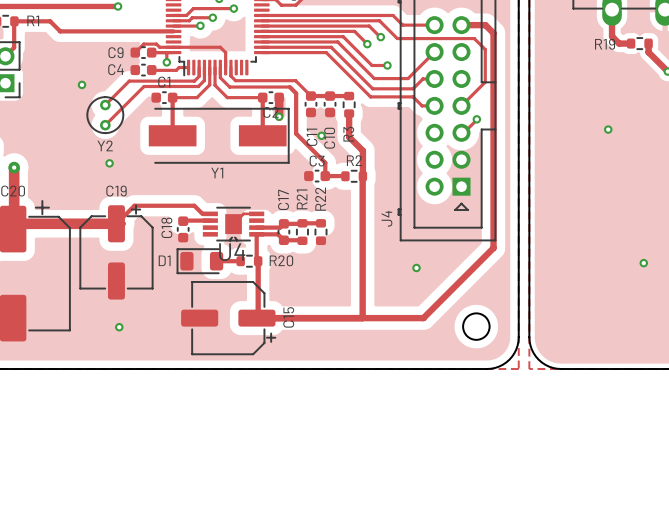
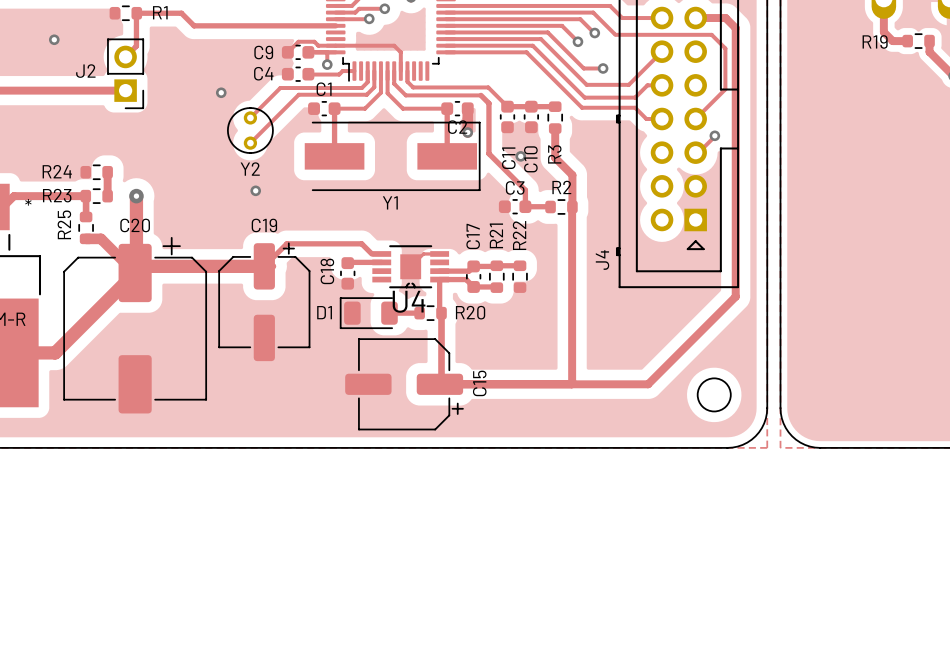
via: (608, 129) -> none
via: (643, 263) -> none
via: (416, 267) -> none
via: (119, 327) -> none

